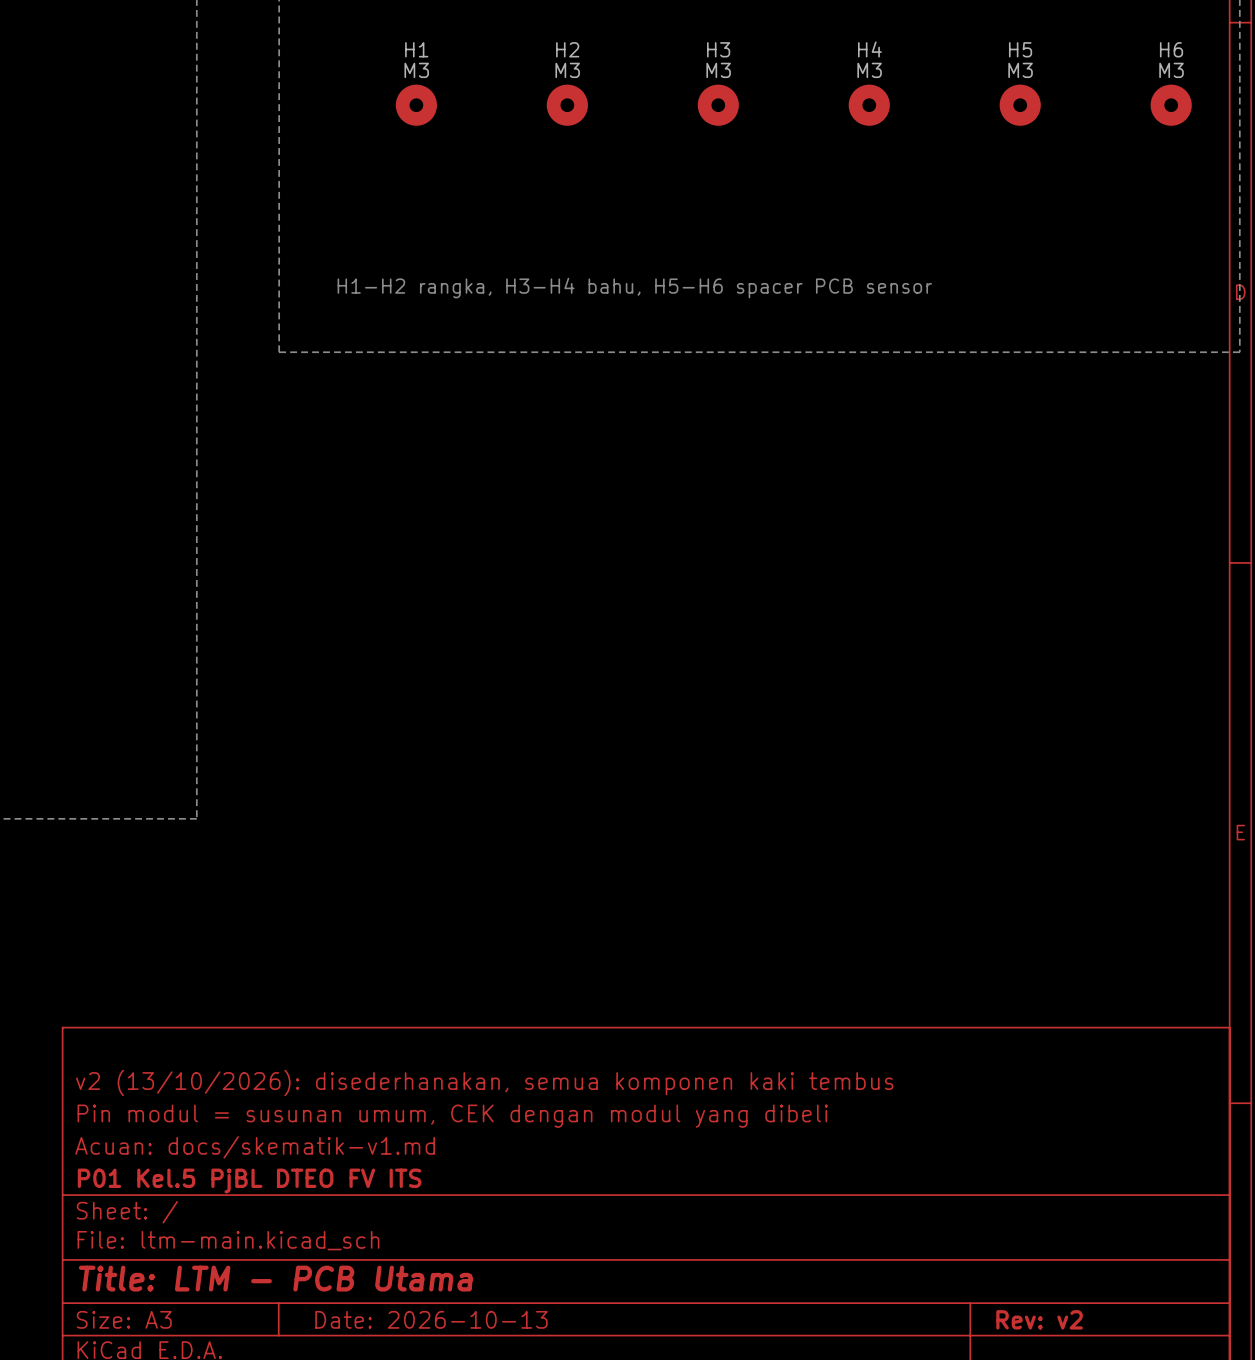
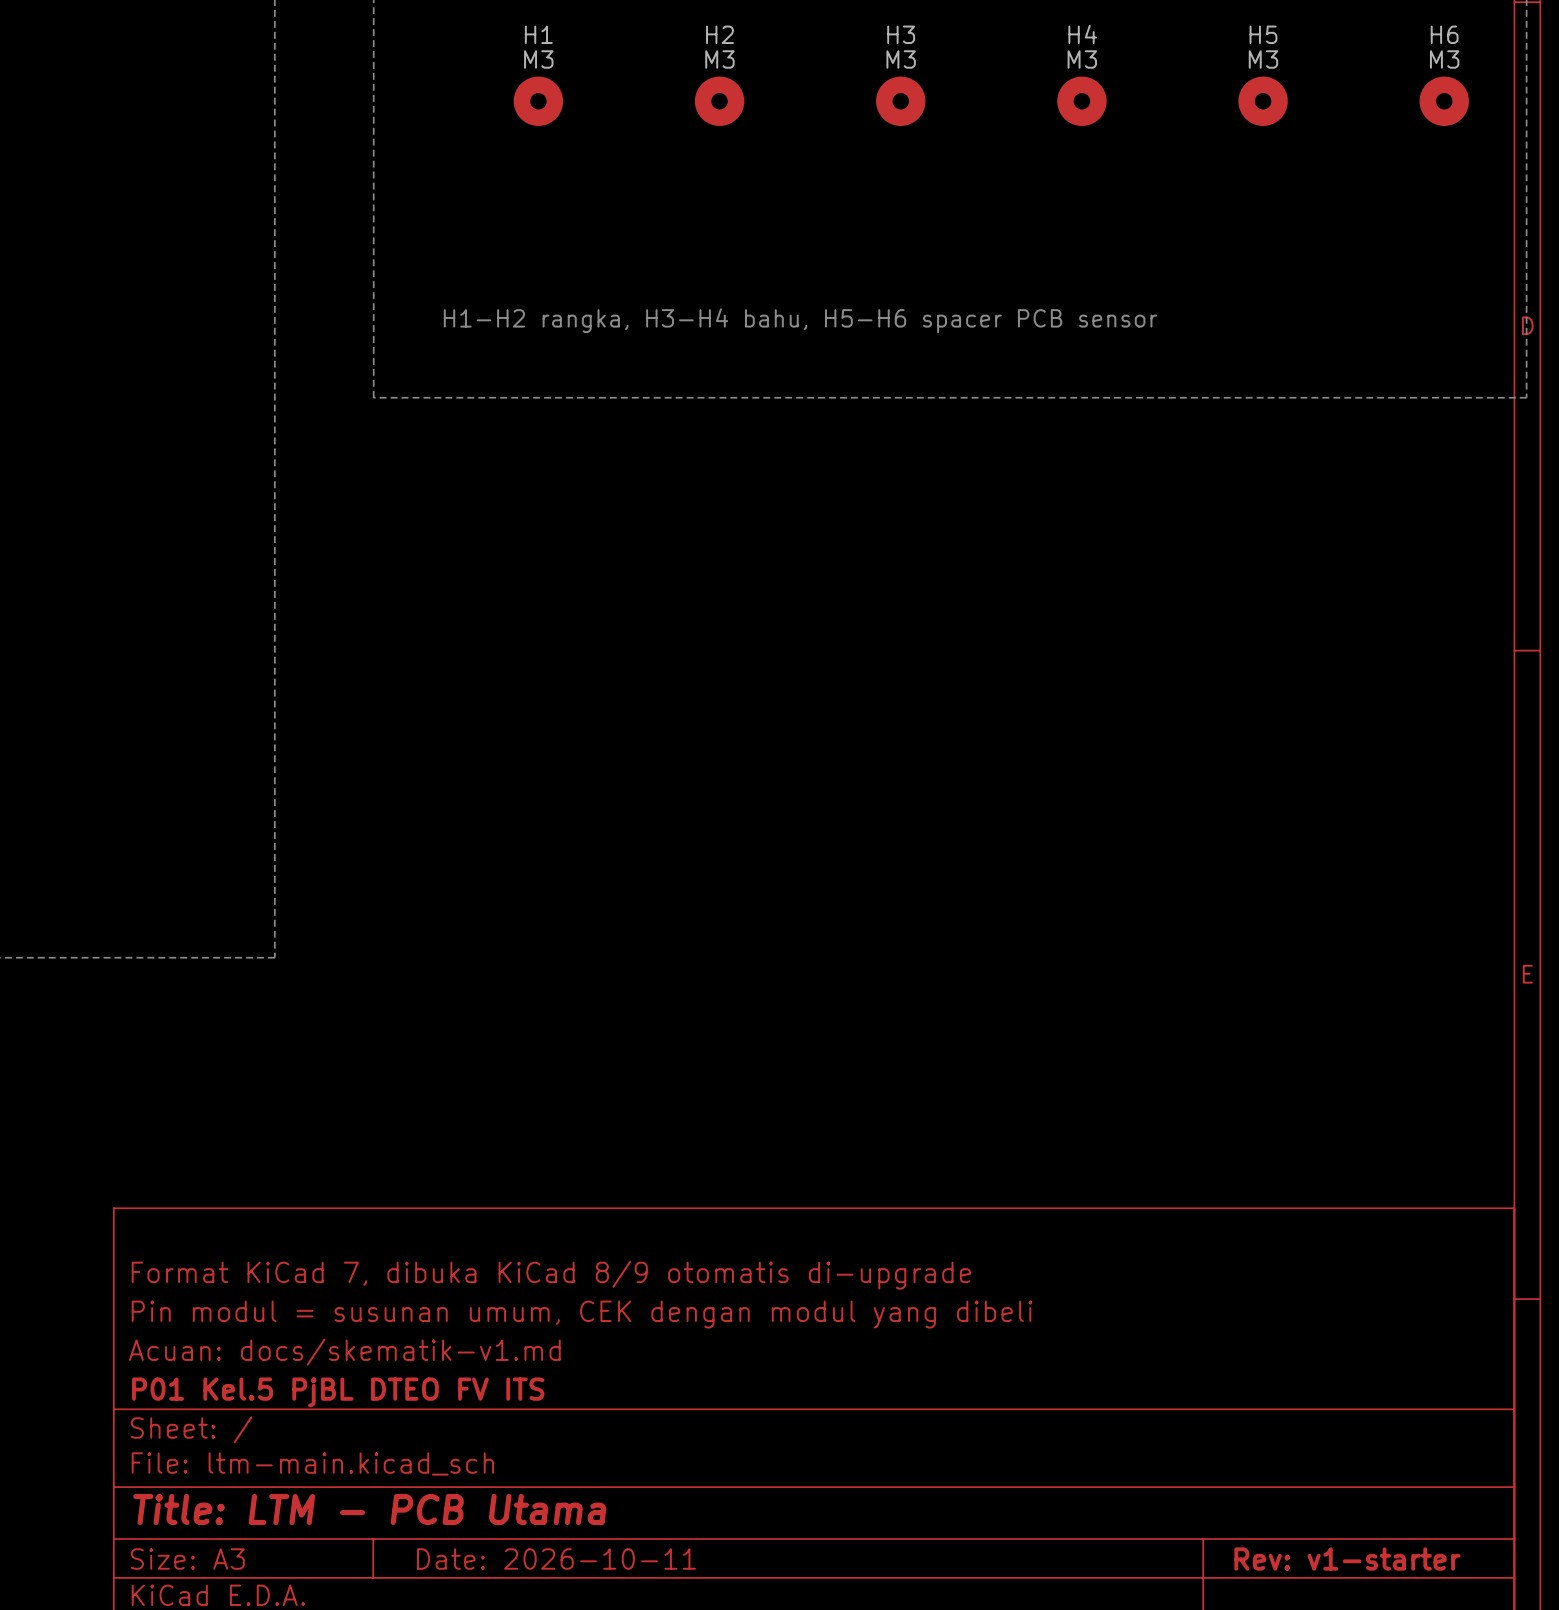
title block: v2 (13/10/2026): disederhanakan, semua komponen kaki tembus (484, 1082) -> Format KiCad 7, dibuka KiCad 8/9 otomatis di-upgrade (551, 1275)
title block: Date: 2026-10-13 (431, 1319) -> Date: 2026-10-11 (556, 1559)
title block: Rev: v2 (1039, 1319) -> Rev: v1-starter (1347, 1559)

